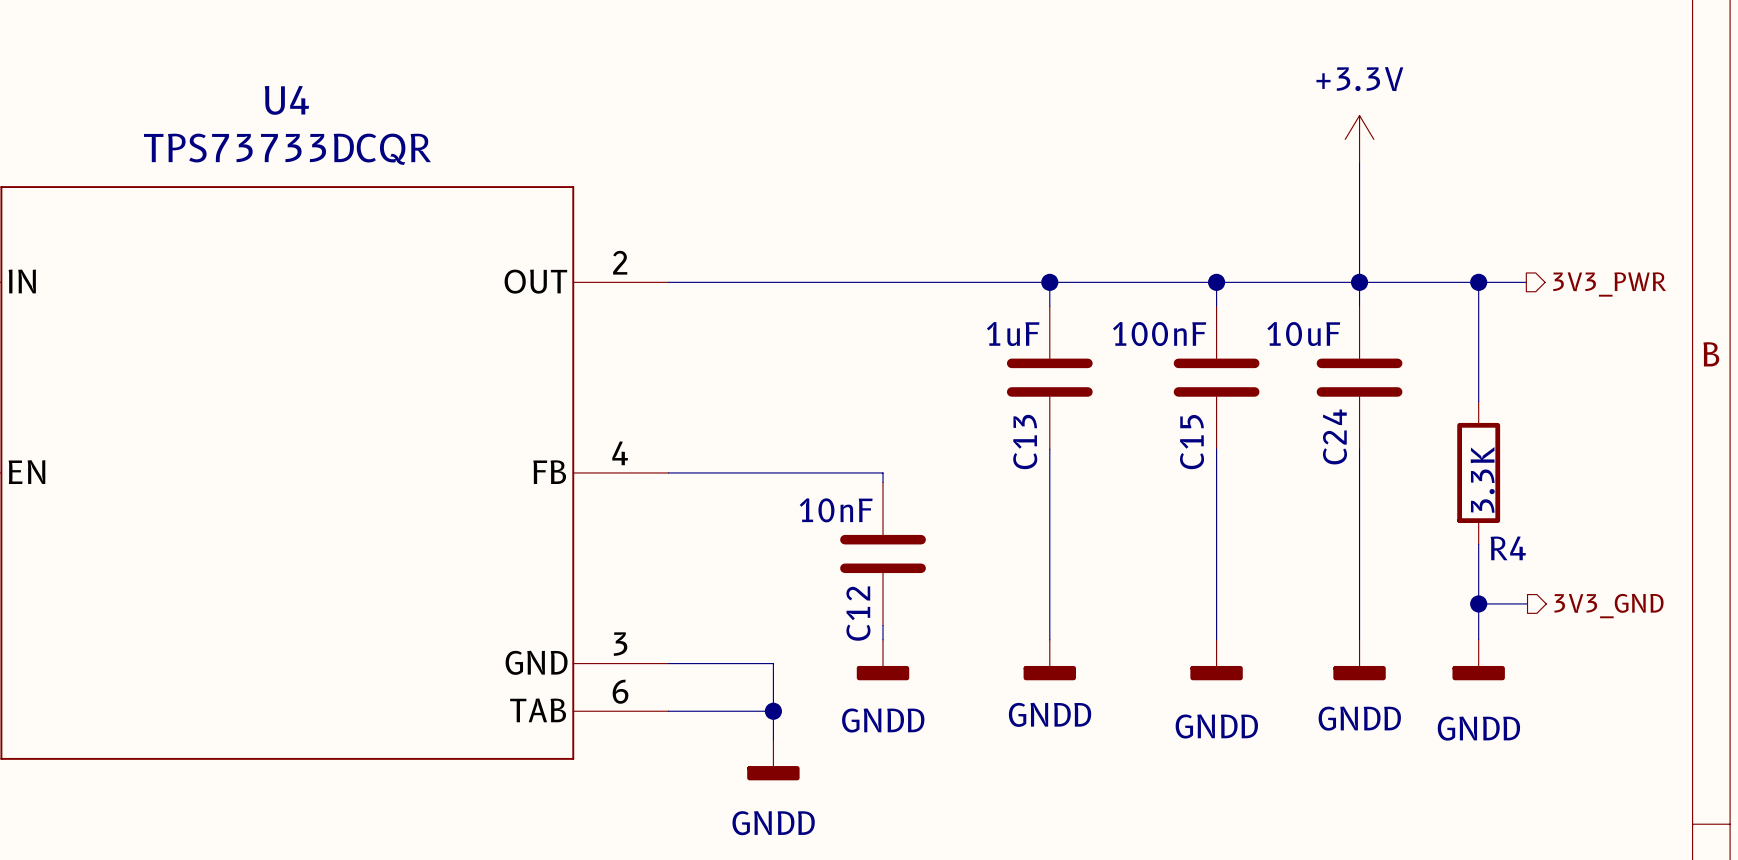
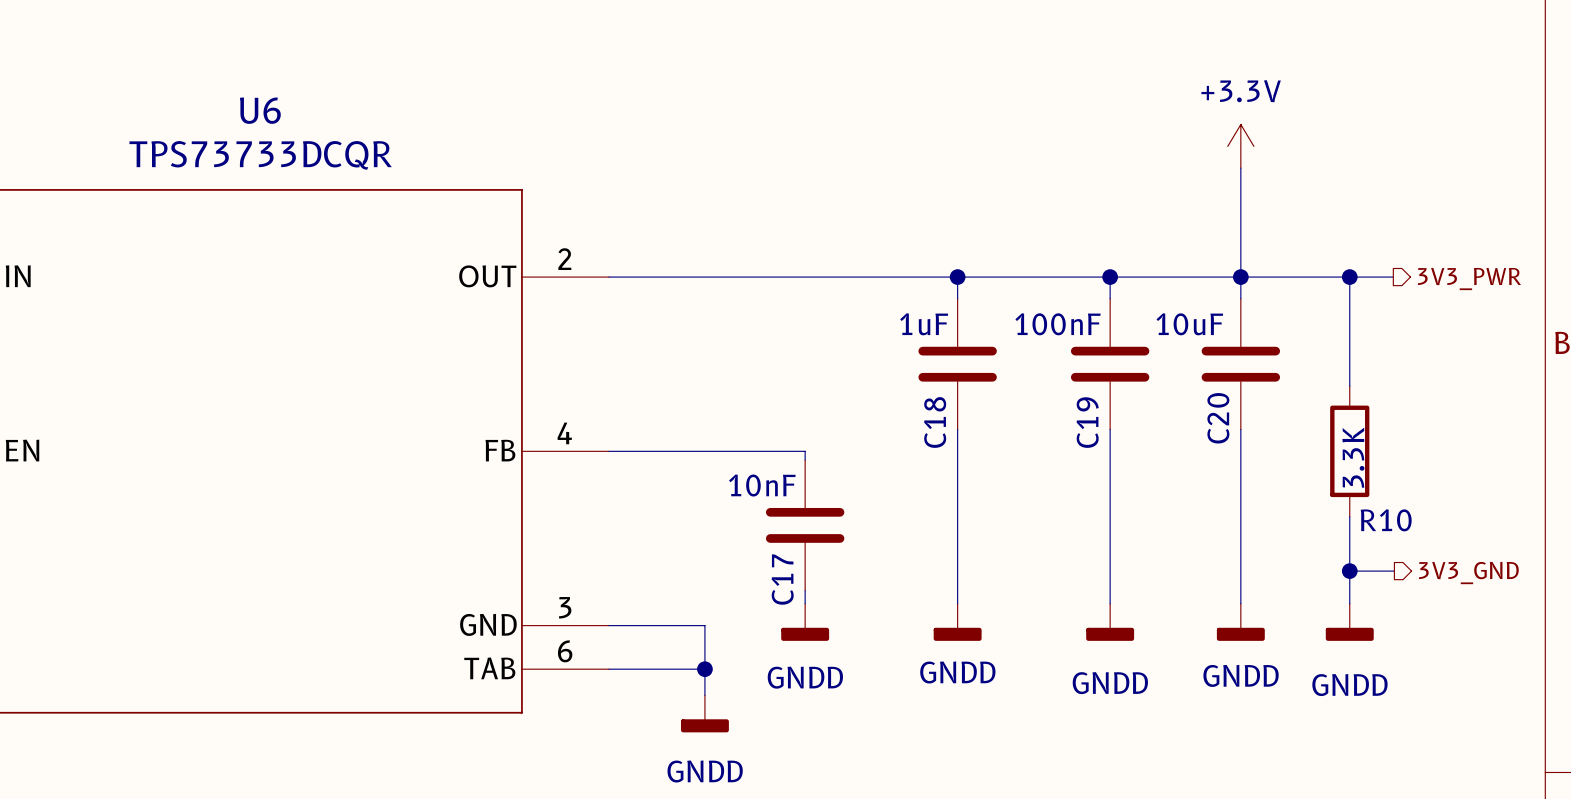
U4 name: U4 (286, 100) -> U6 (260, 110)
C24 name: C24 (1334, 436) -> C20 (1218, 418)
C13 name: C13 (1025, 442) -> C18 (935, 422)
C15 name: C15 (1192, 442) -> C19 (1087, 422)
R4 name: R4 (1508, 548) -> R10 (1386, 520)
C12 name: C12 (858, 613) -> C17 (782, 579)

